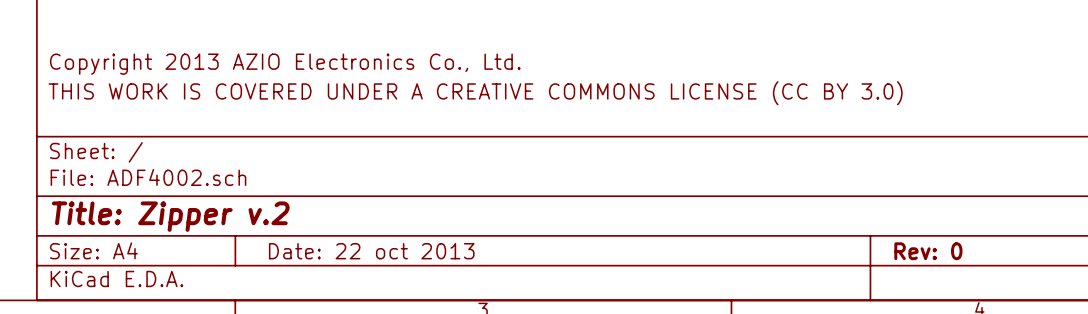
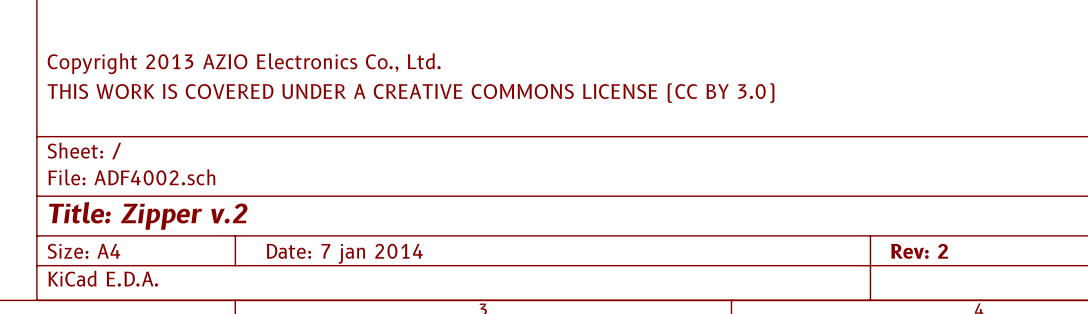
title block: Date: 22 oct 2013 (371, 251) -> Date: 7 jan 2014 (344, 253)
title block: Rev: 0 (928, 251) -> Rev: 2 (919, 251)

